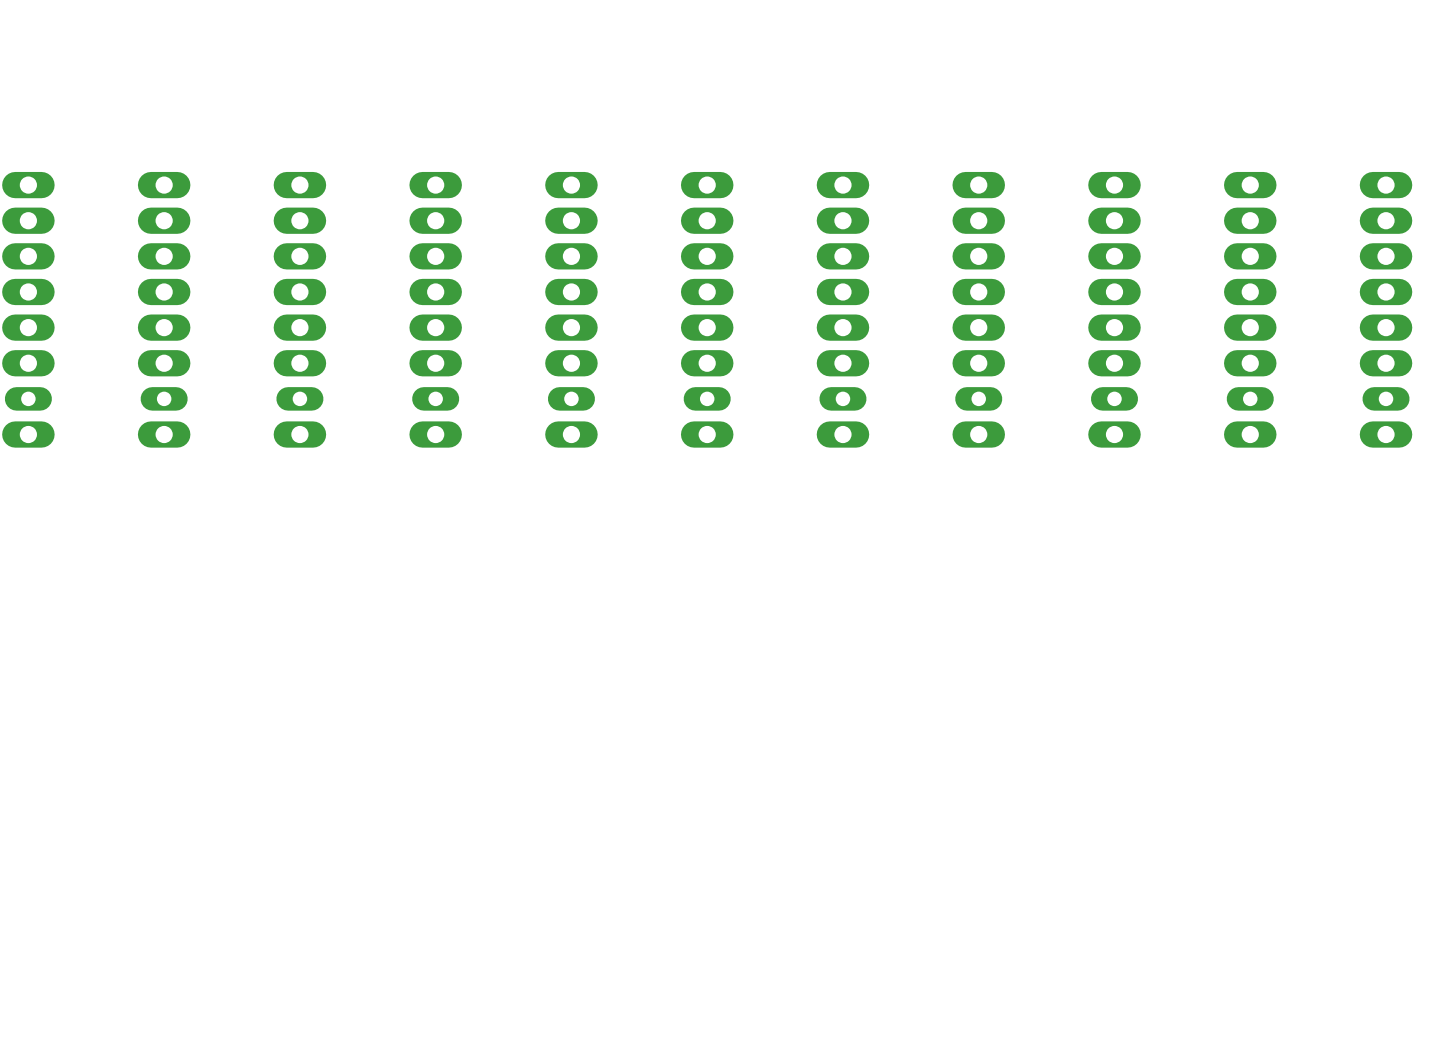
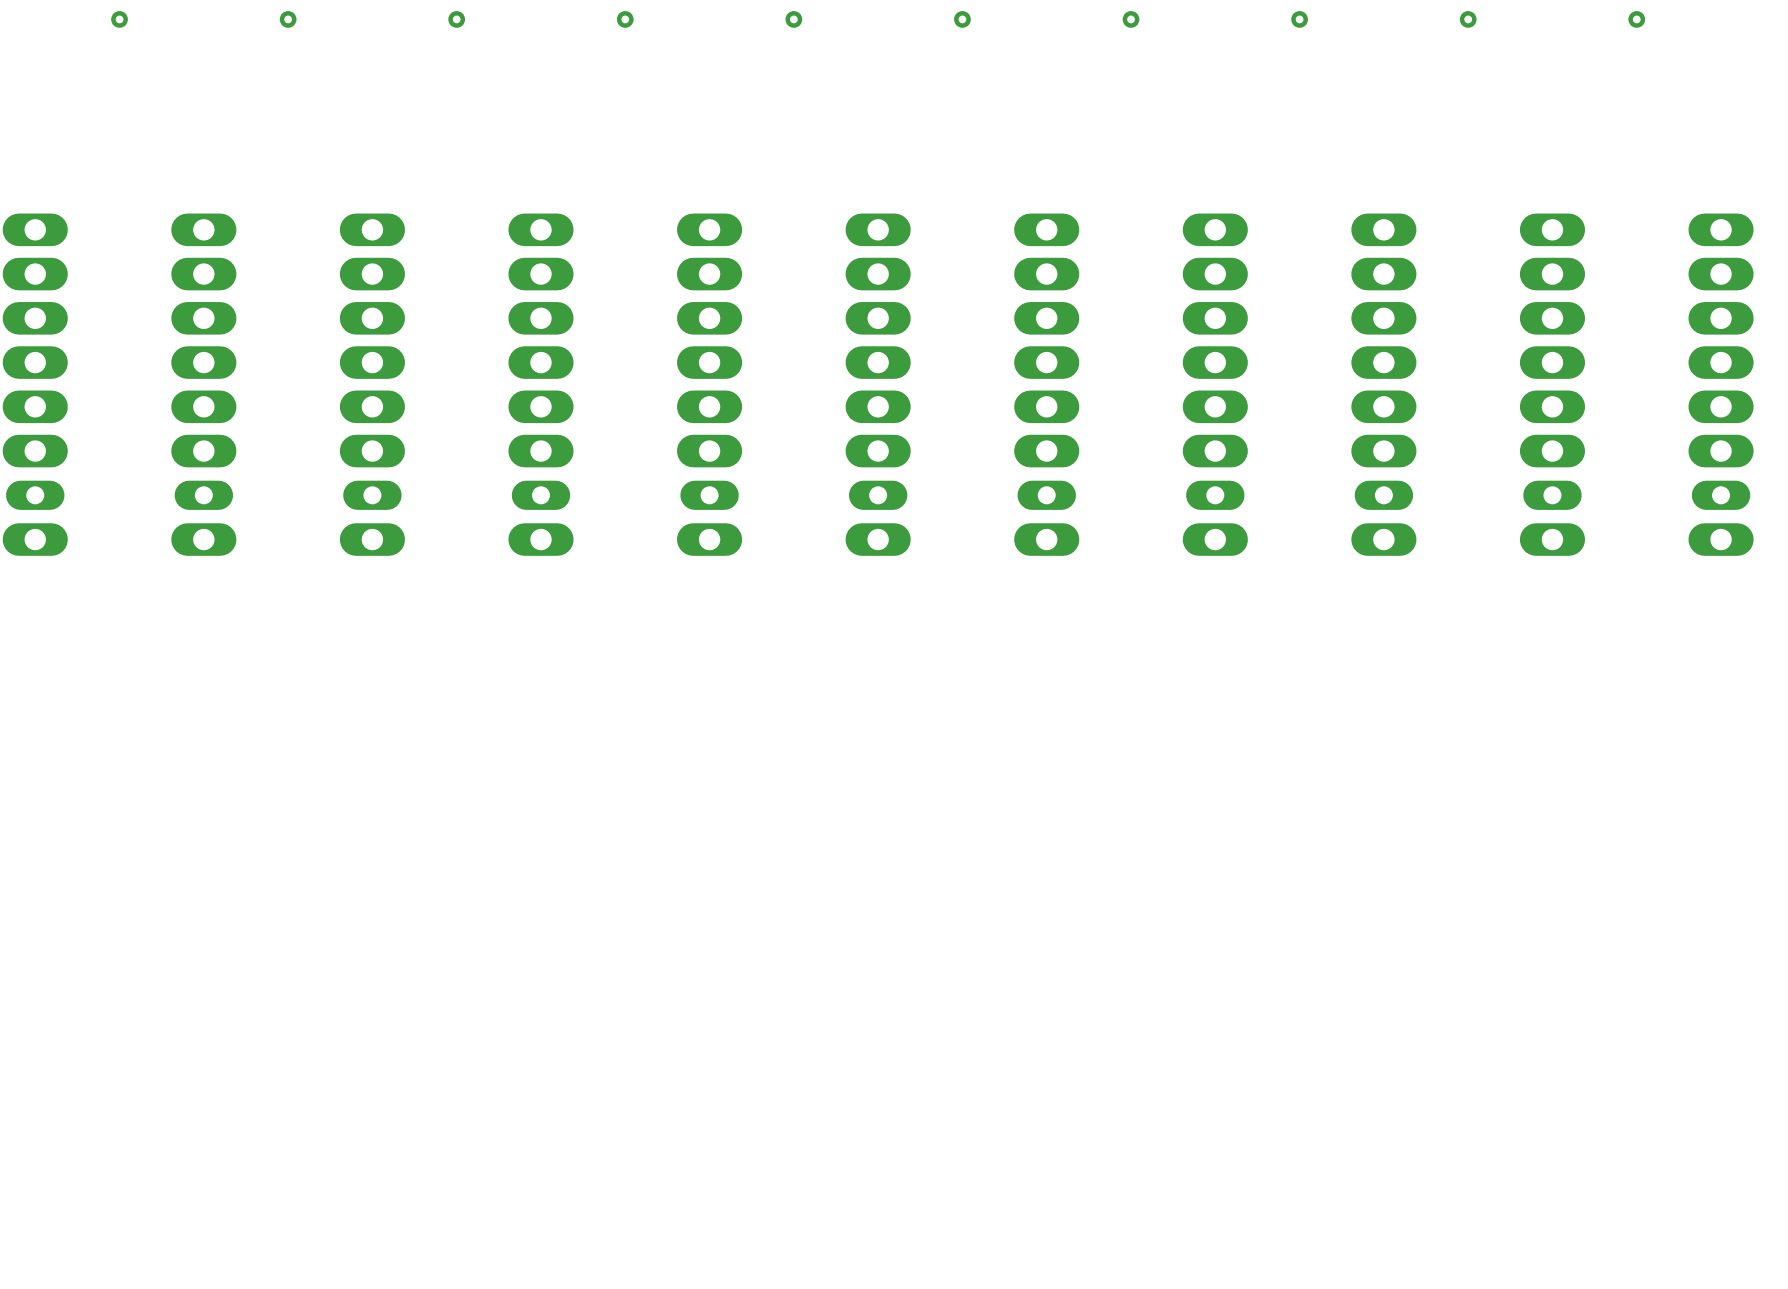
via: none -> (119, 19)
via: none -> (288, 19)
via: none -> (456, 19)
via: none -> (625, 19)
via: none -> (793, 19)
via: none -> (962, 19)
via: none -> (1131, 19)
via: none -> (1299, 19)
via: none -> (1468, 19)
via: none -> (1636, 19)

